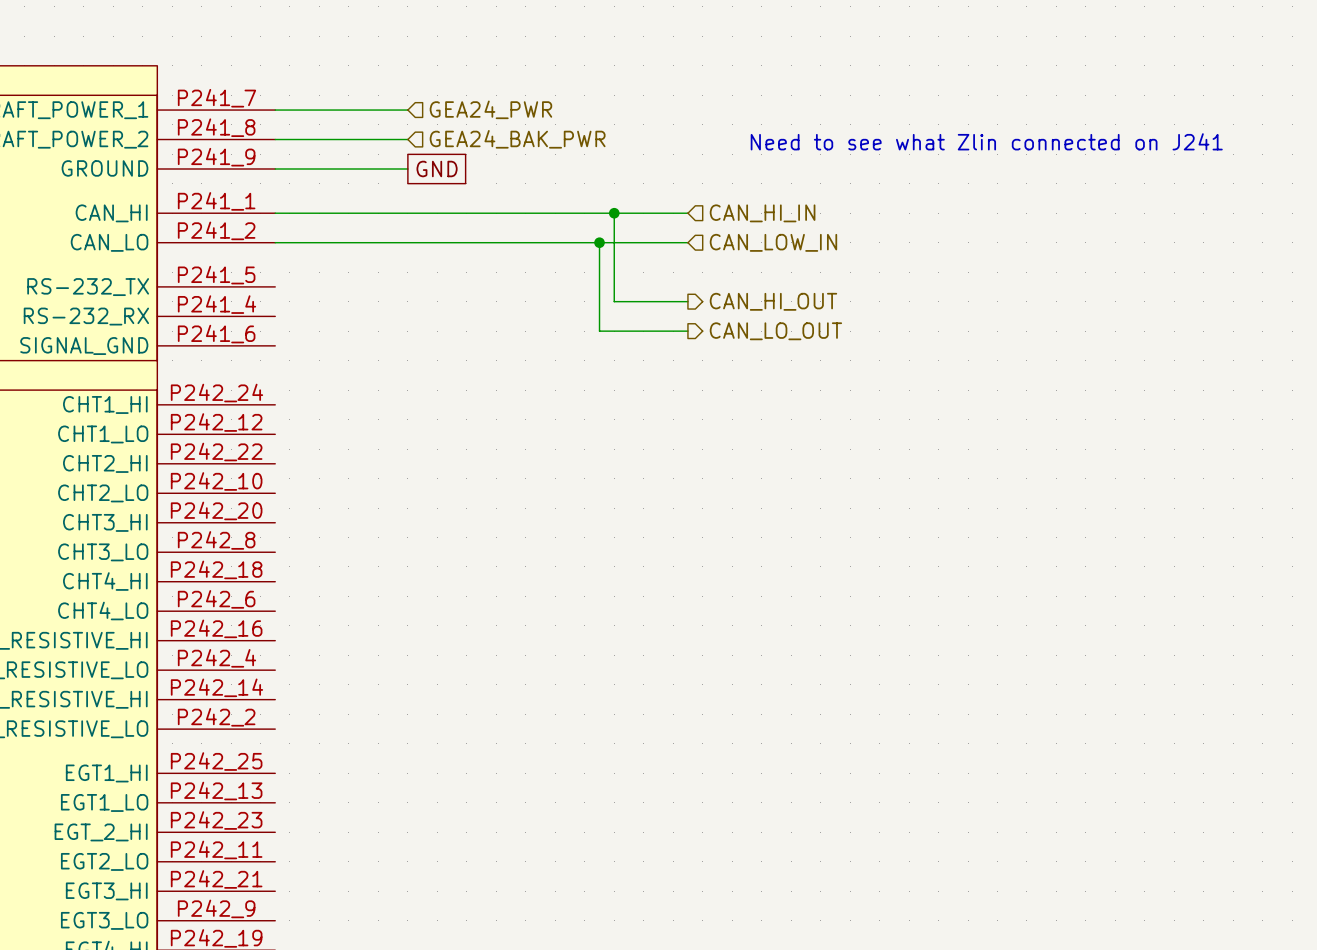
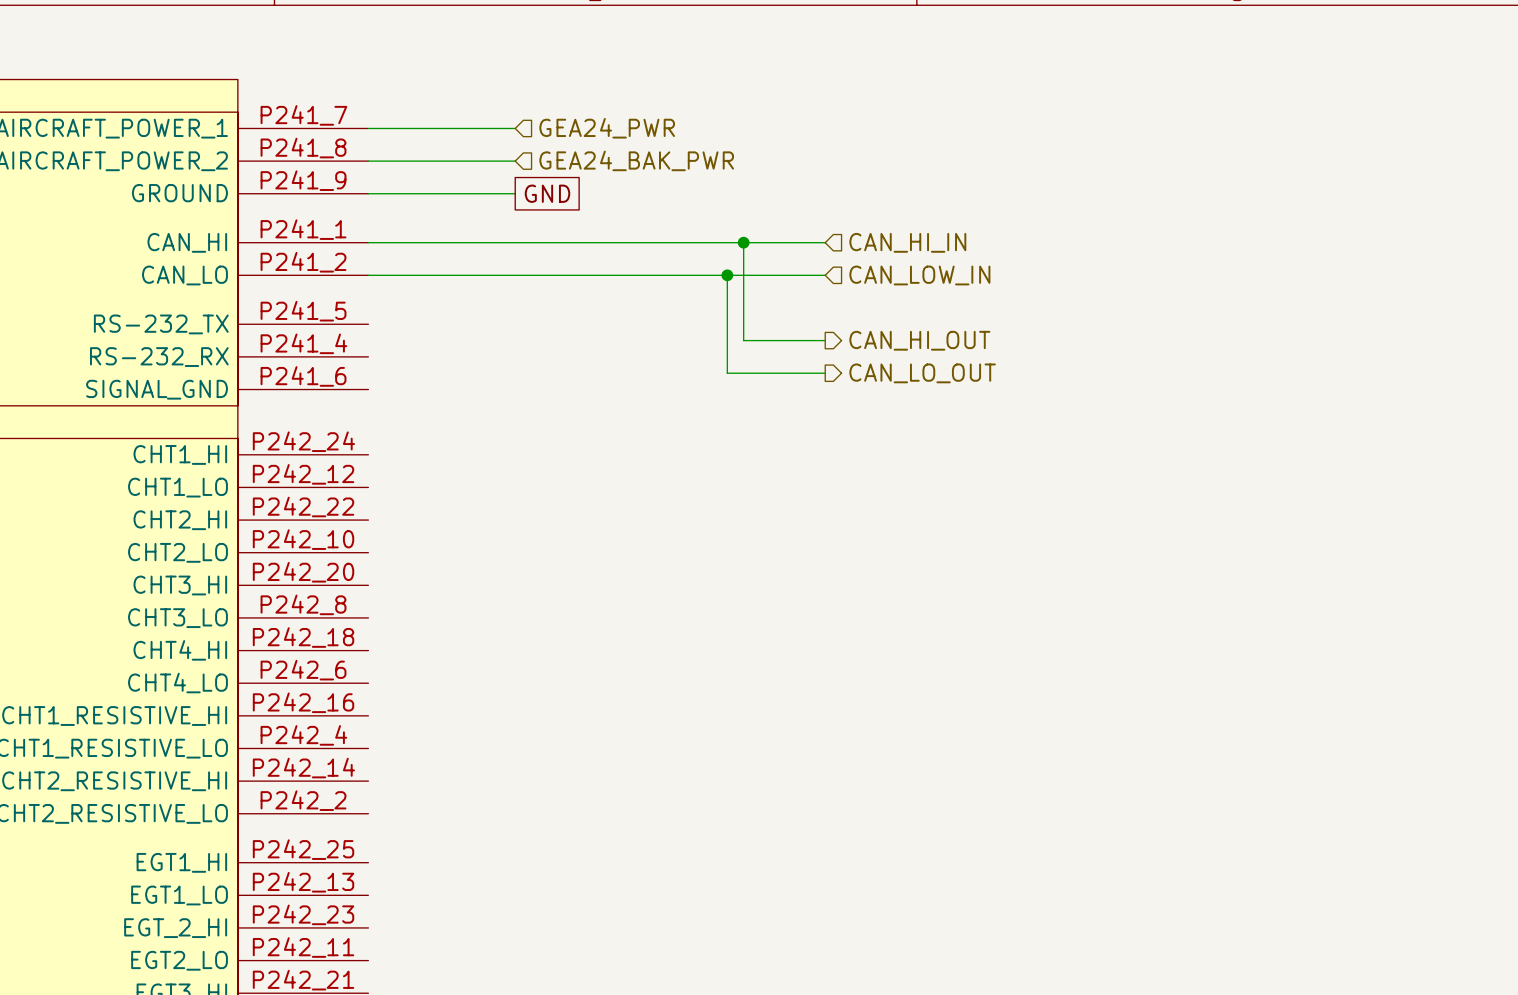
text: Need to see what Zlin connected on J241 (986, 141) -> none

